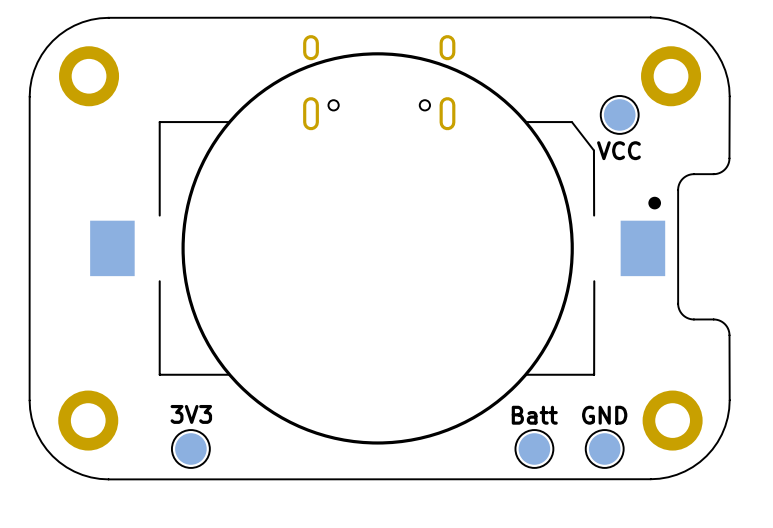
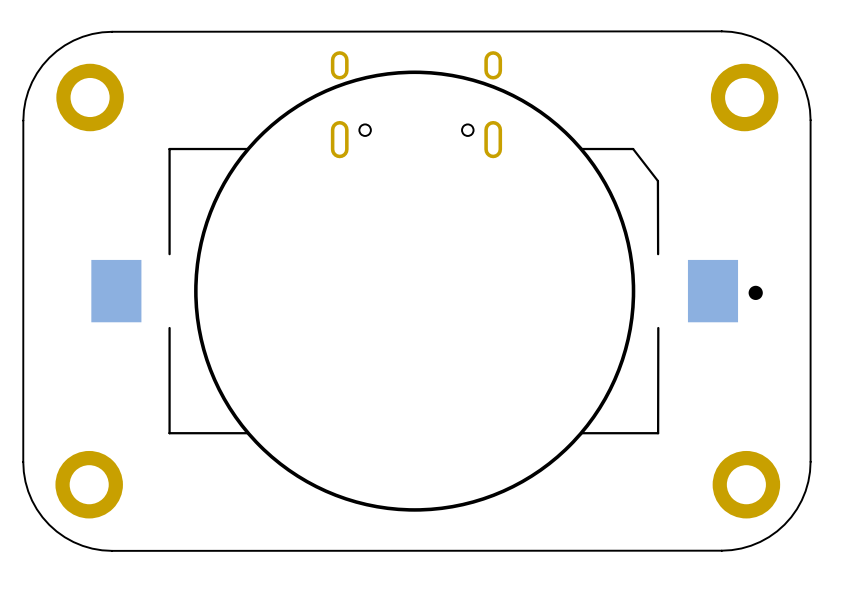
part footprint: [90, 52, 666, 445] -> [91, 70, 763, 512]
board edge: (729, 96) (727, 165) (723, 170) (717, 173) (687, 175) (680, 181) (678, 189) (678, 307) (681, 313) (687, 317) (717, 319) (723, 322) (727, 328) (729, 400) -> (810, 120) (810, 461)
part: (619, 114) -> none
text: VCC (618, 150) -> none
text: 3V3 (191, 414) -> none
text: Batt (534, 415) -> none
text: GND (604, 415) -> none
part: (190, 448) -> none
part: (534, 448) -> none
part: (604, 448) -> none

